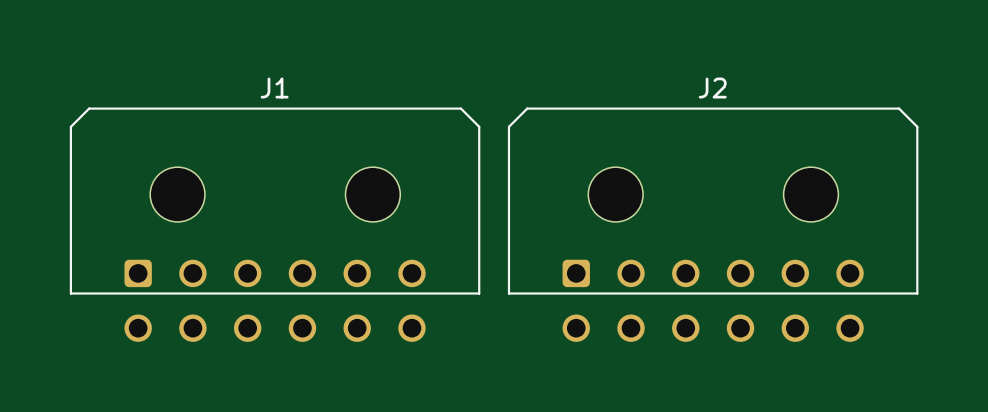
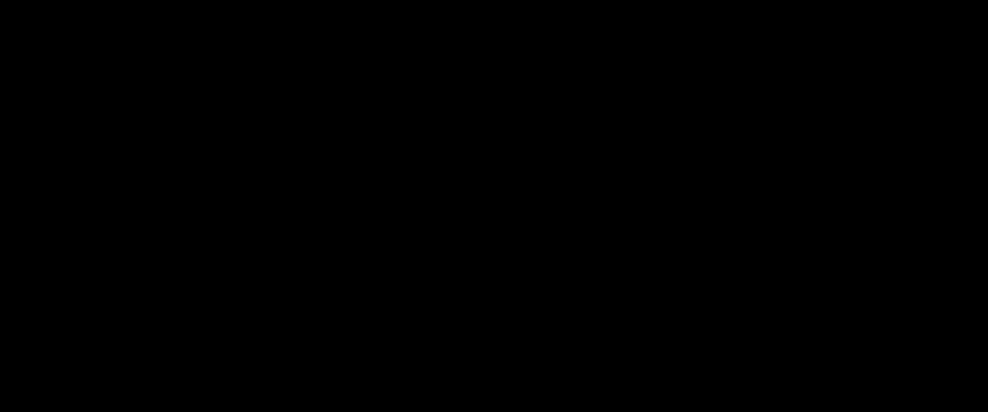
J1: (275, 224) -> none
J2: (713, 224) -> none

